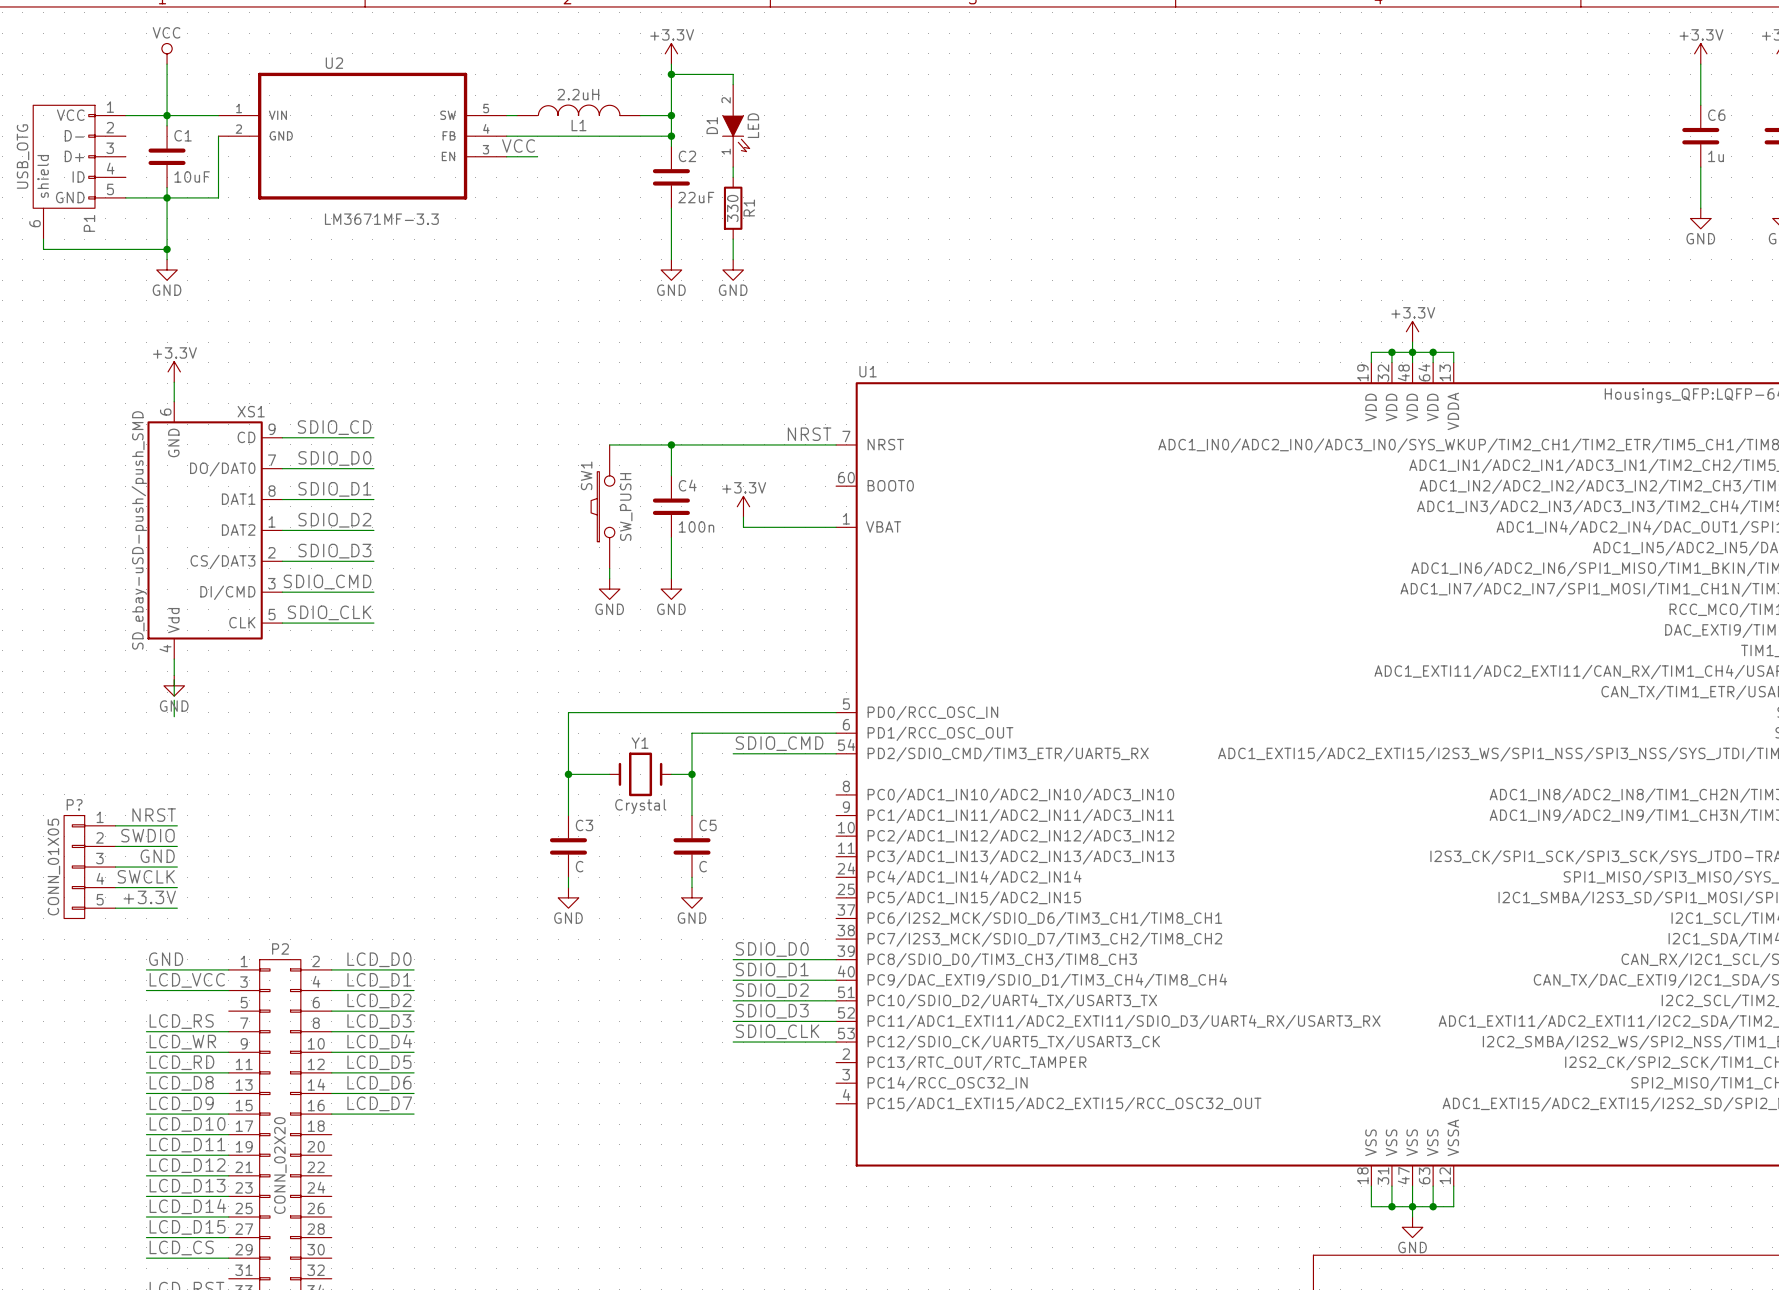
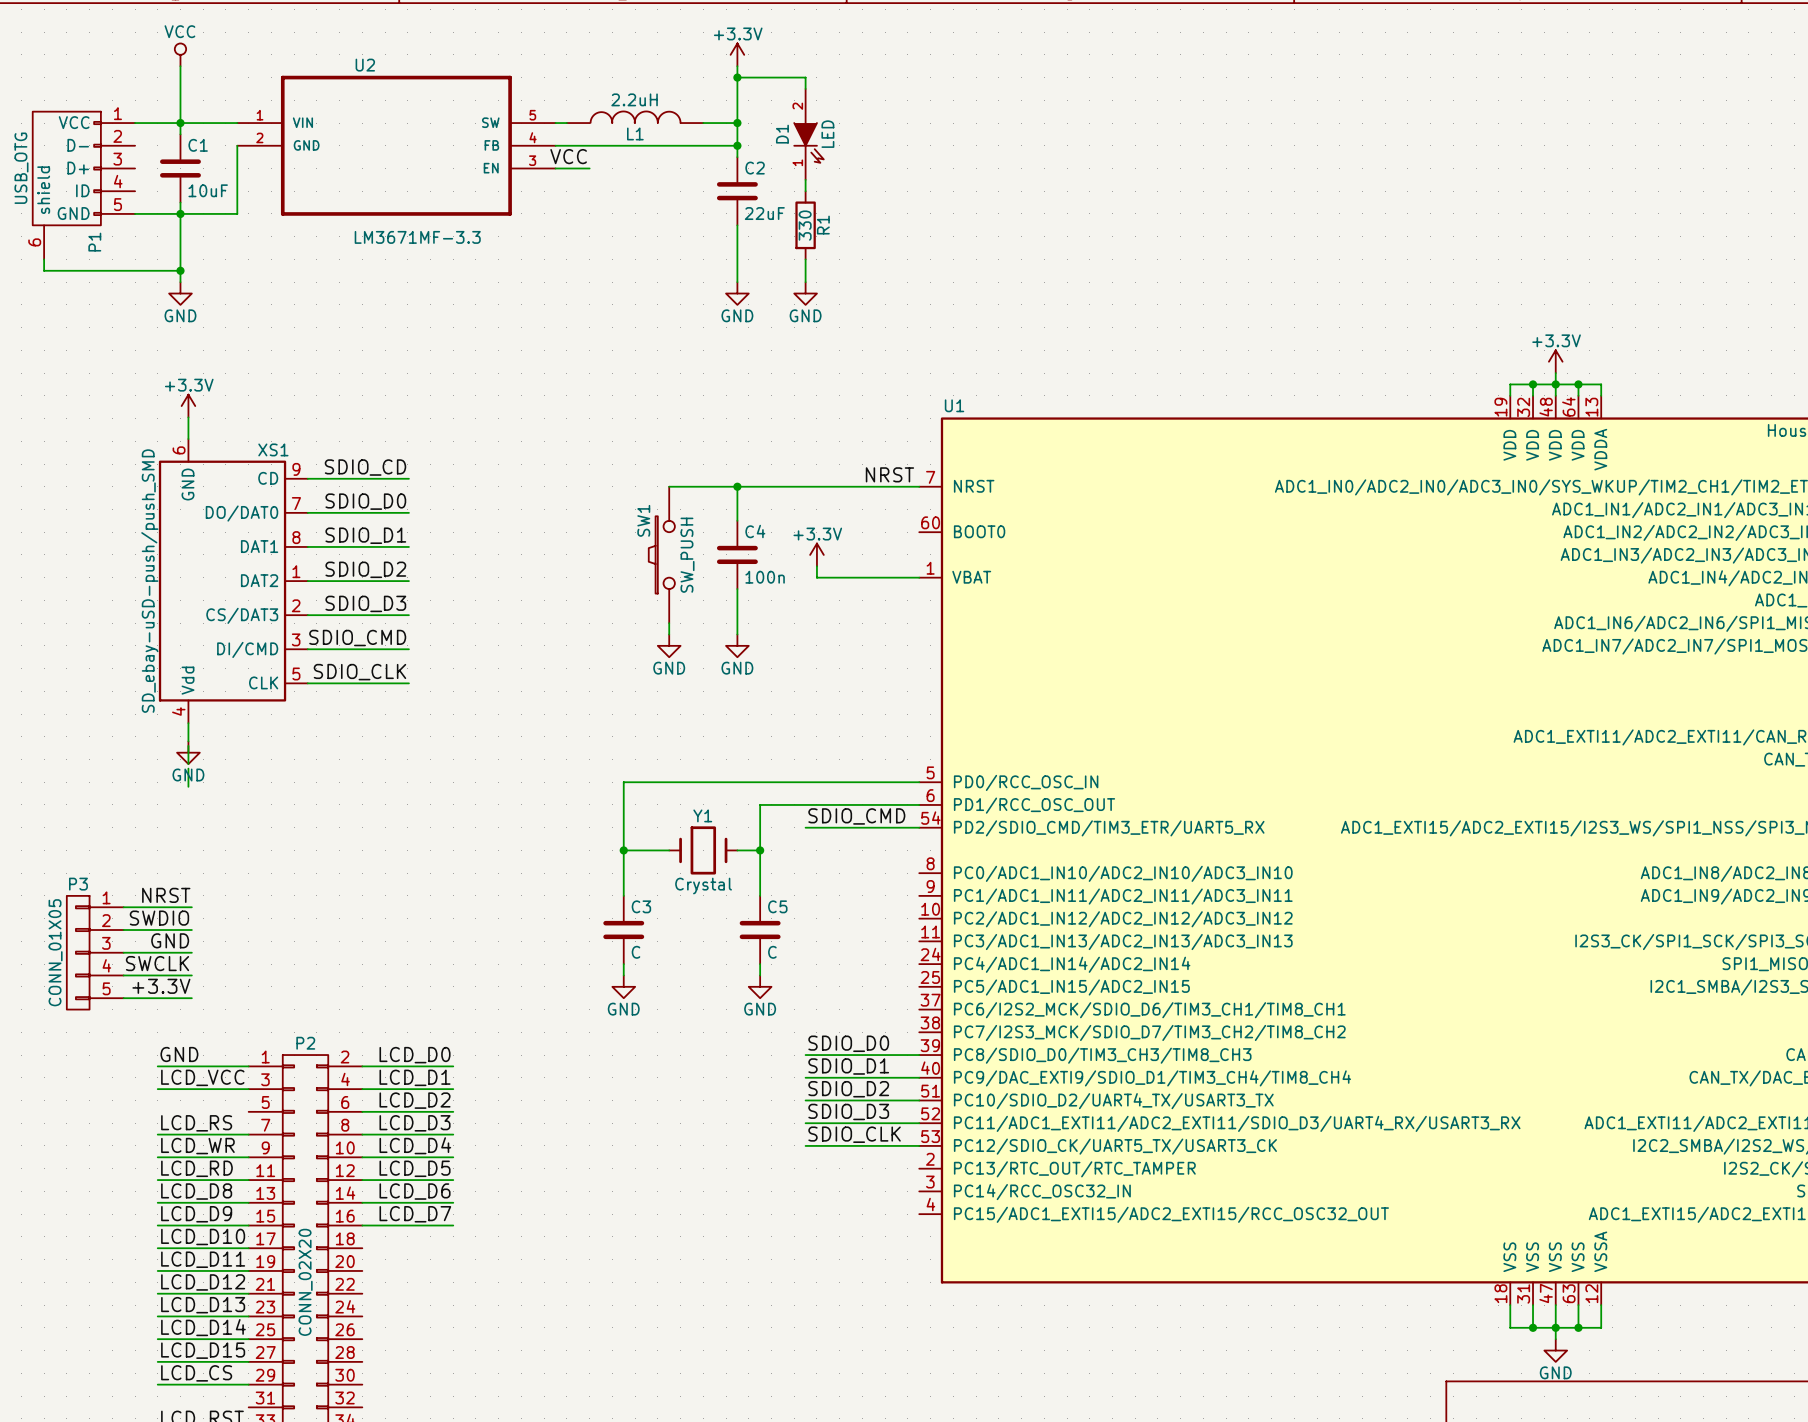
P? name: P? (74, 804) -> P3 (78, 884)

